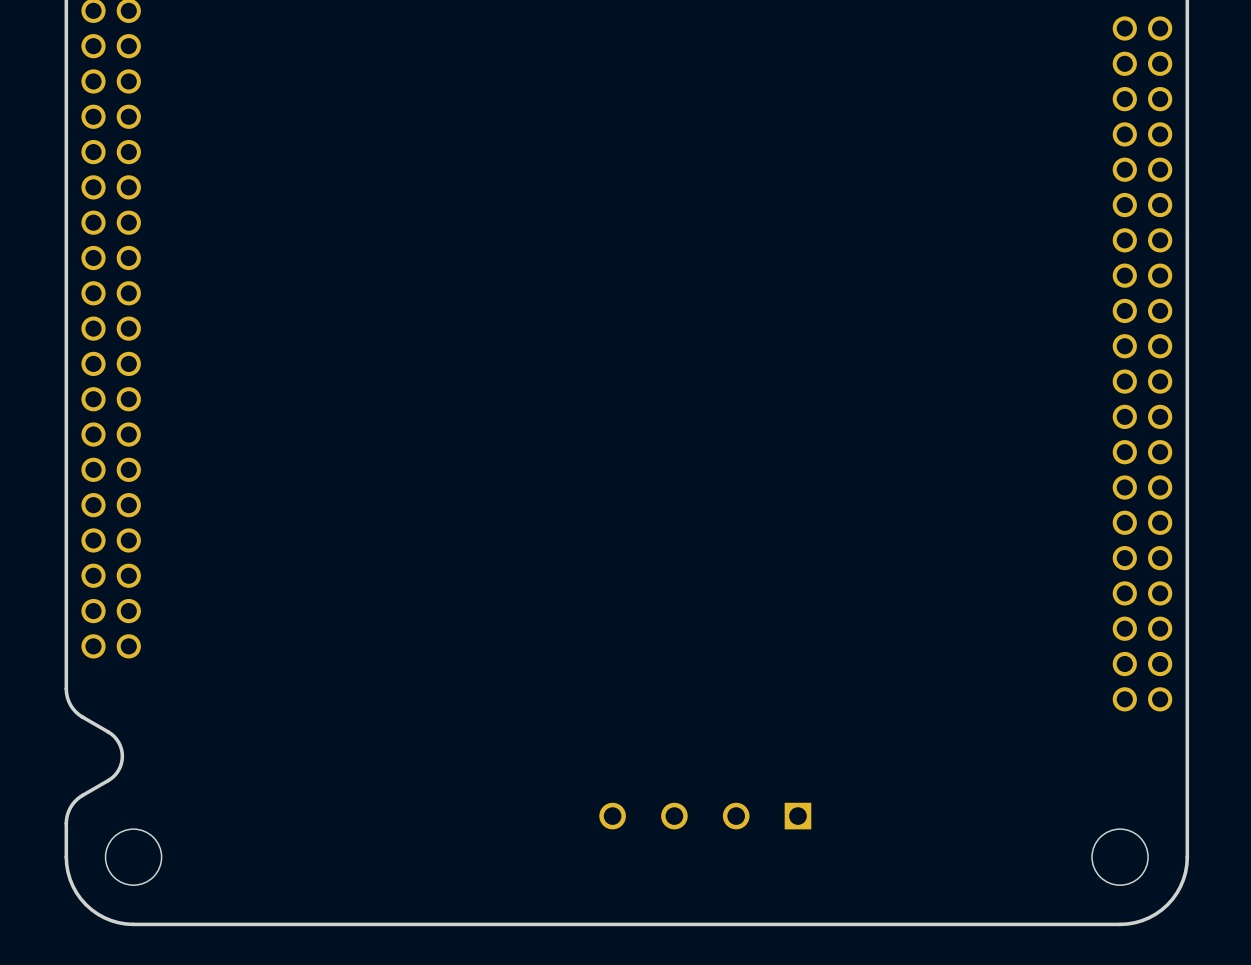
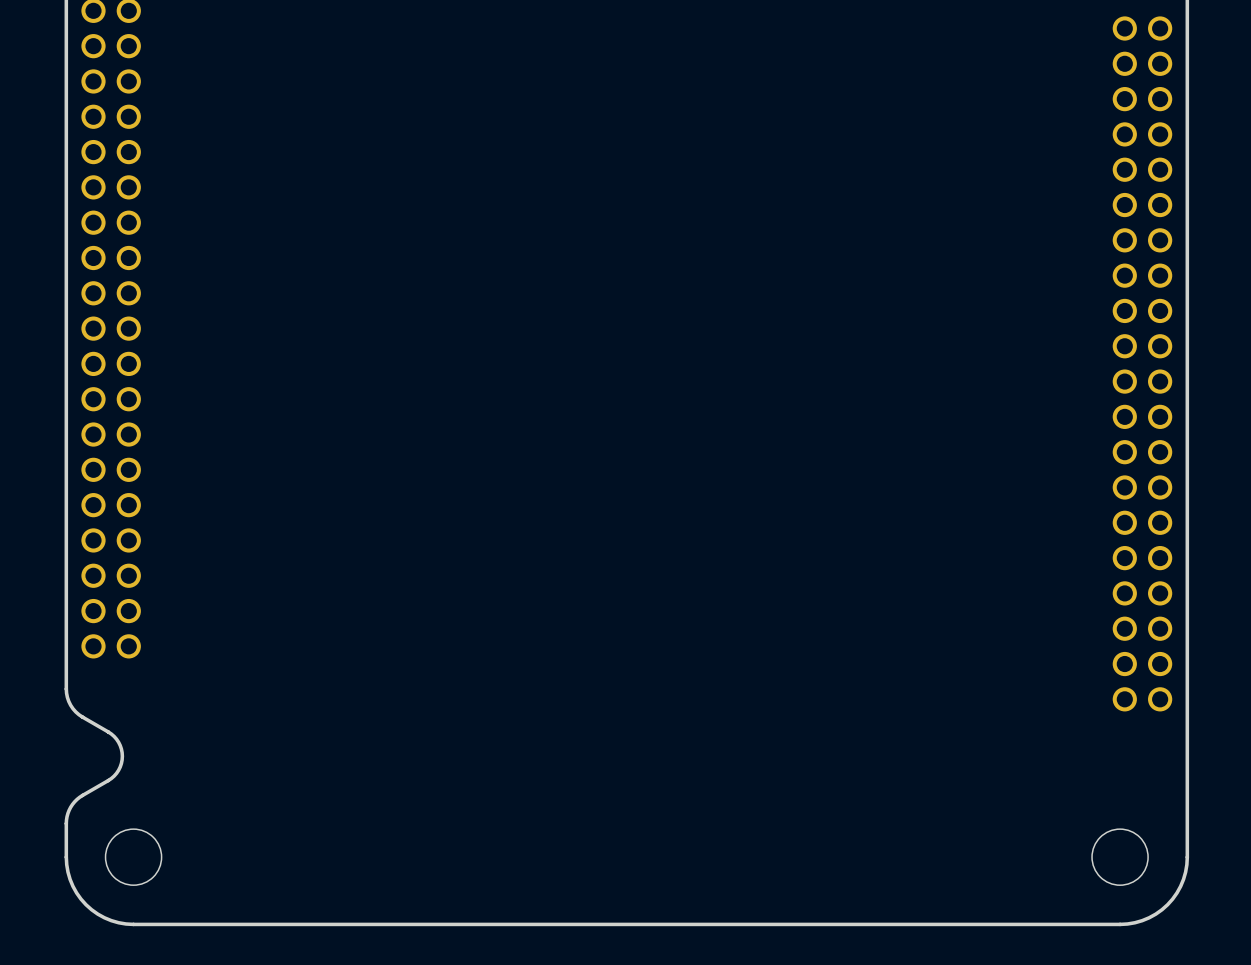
part: (705, 816) -> none

